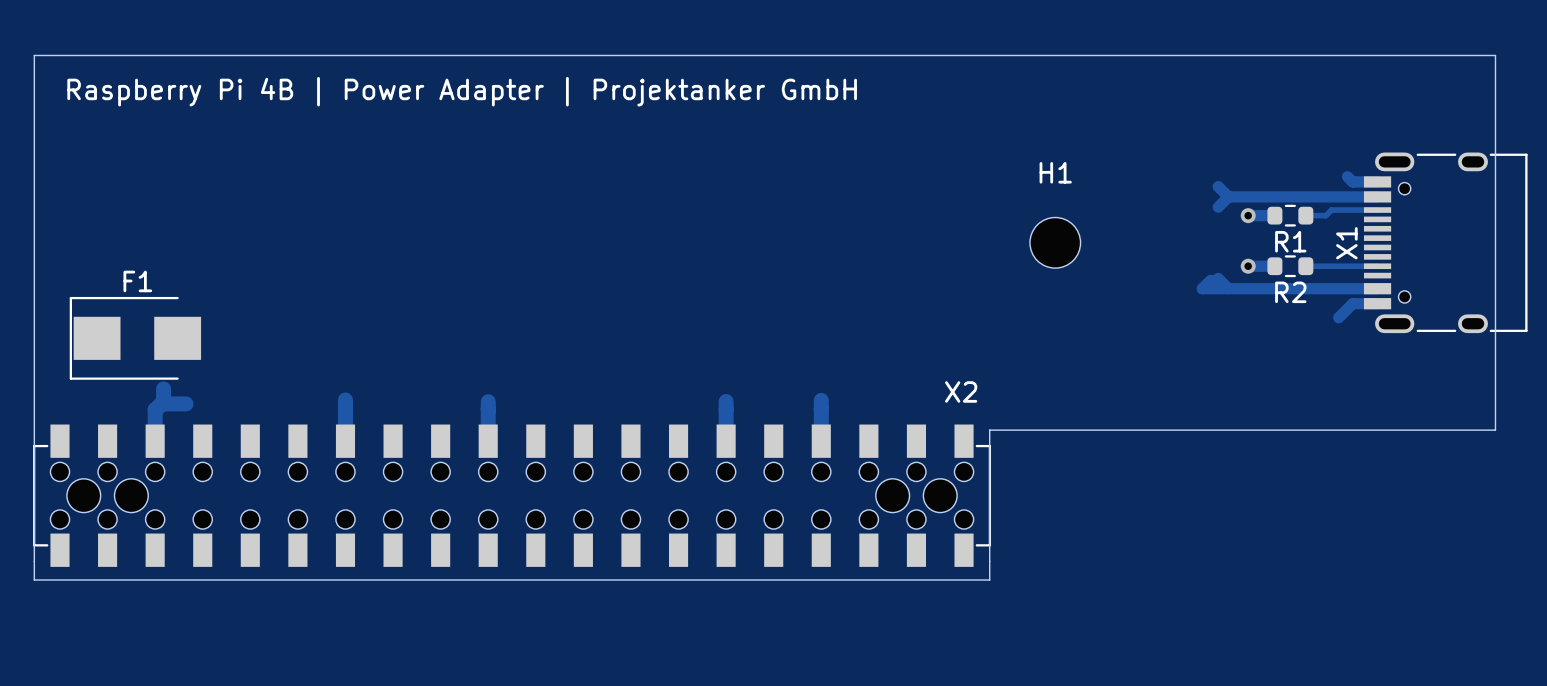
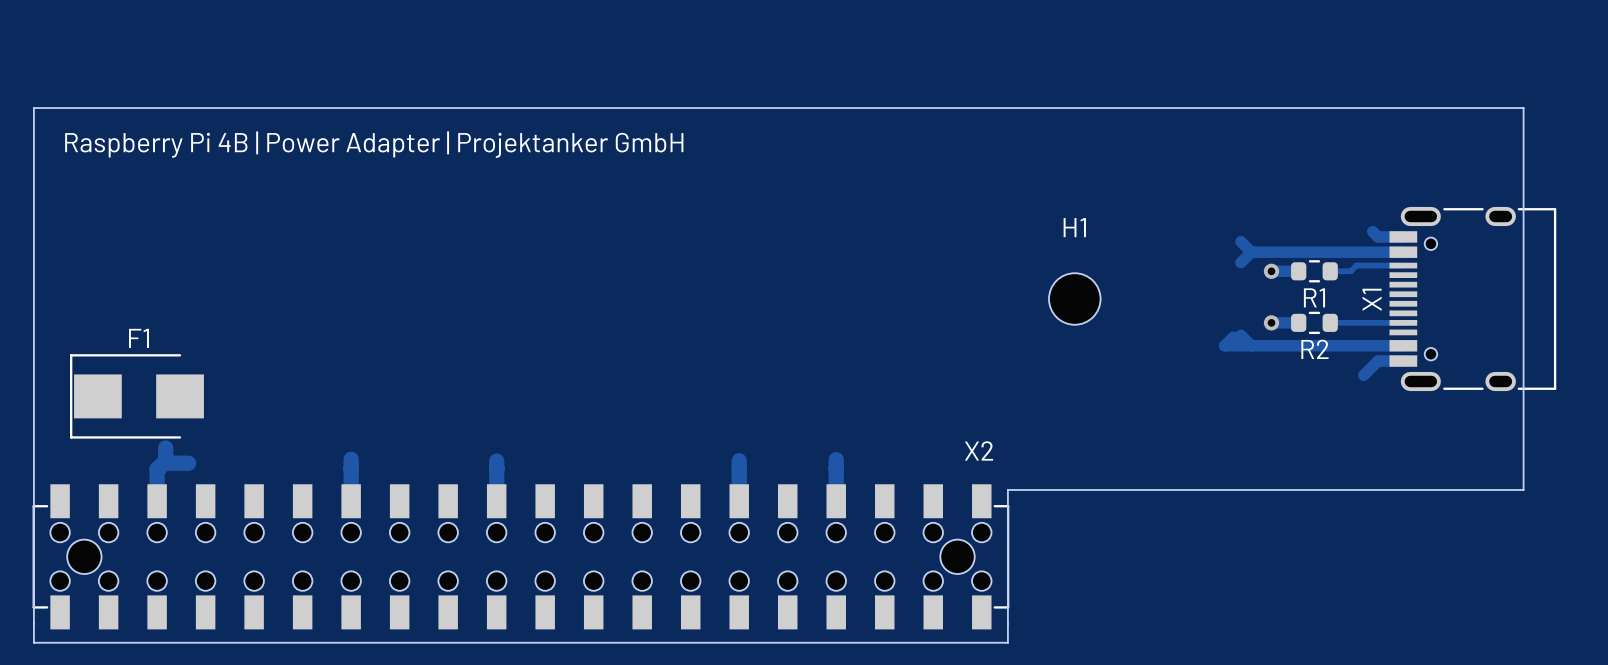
part: (131, 495) -> none
part: (892, 495) -> none

